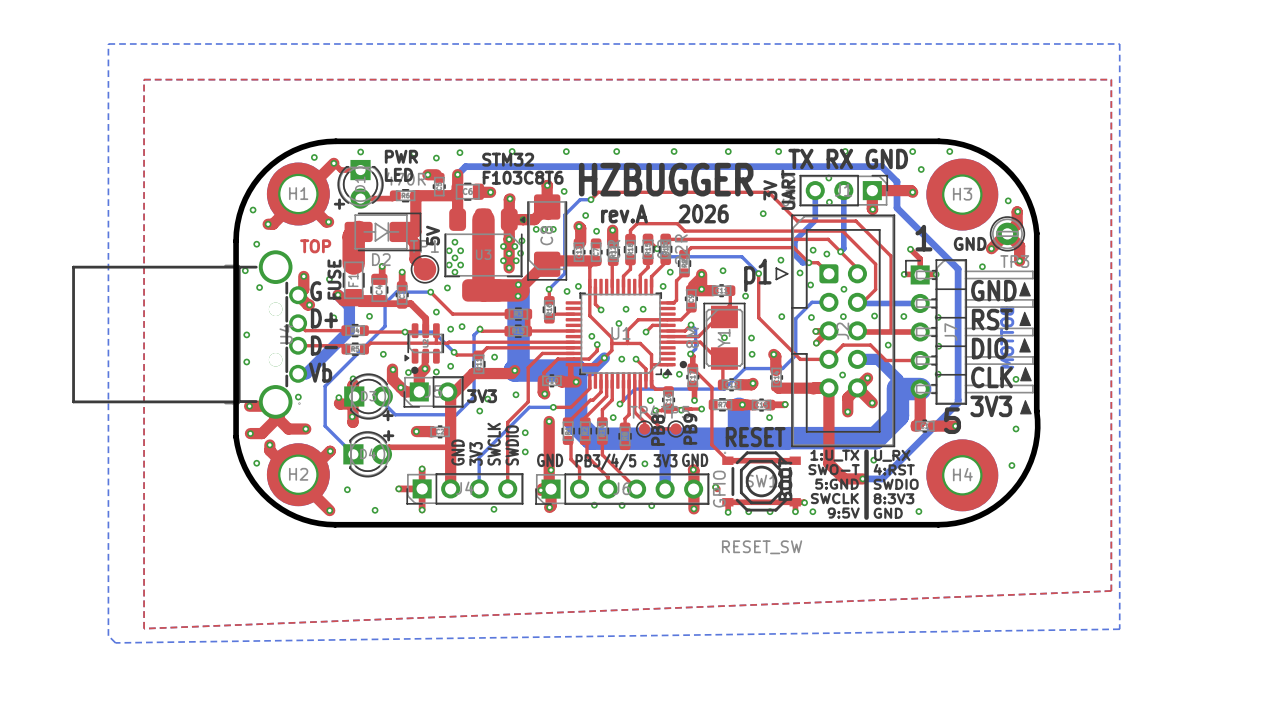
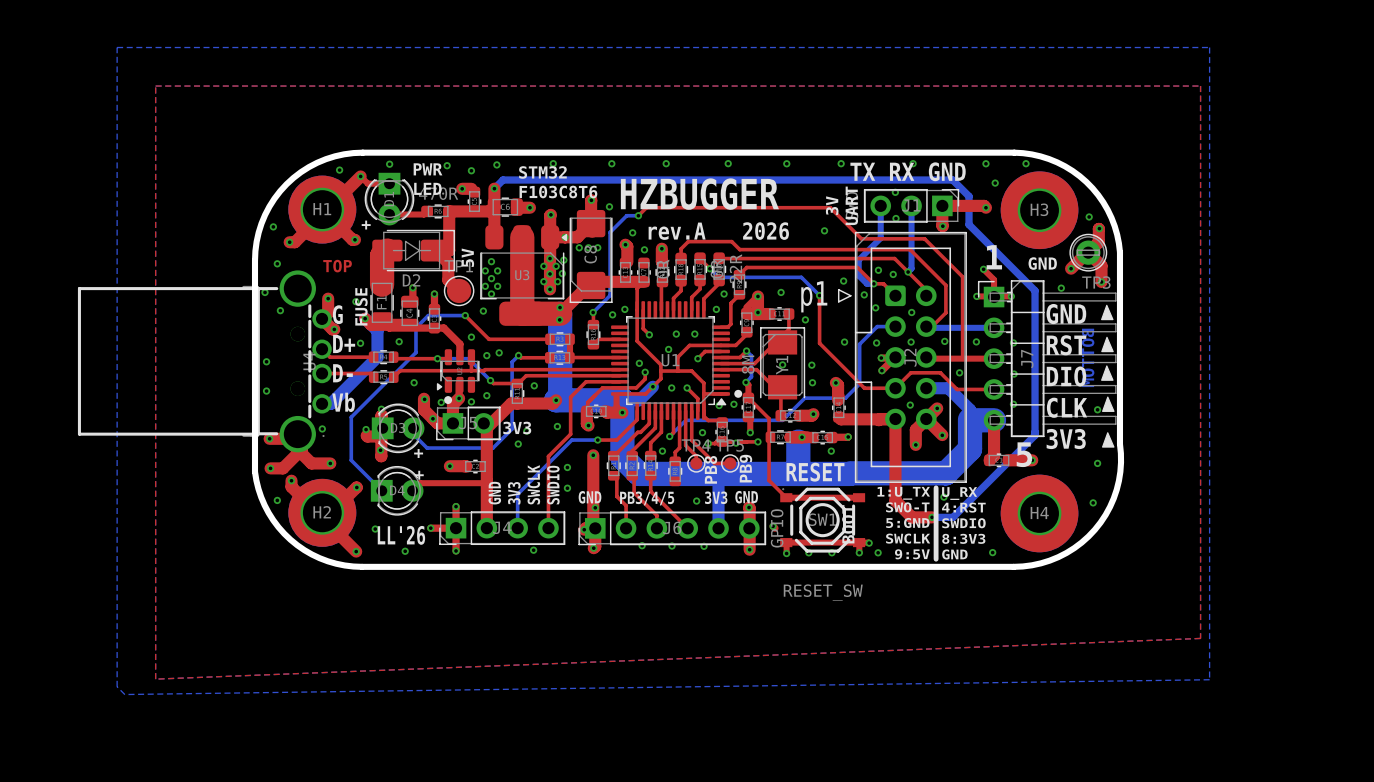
text: none -> LL'26 (401, 535)

